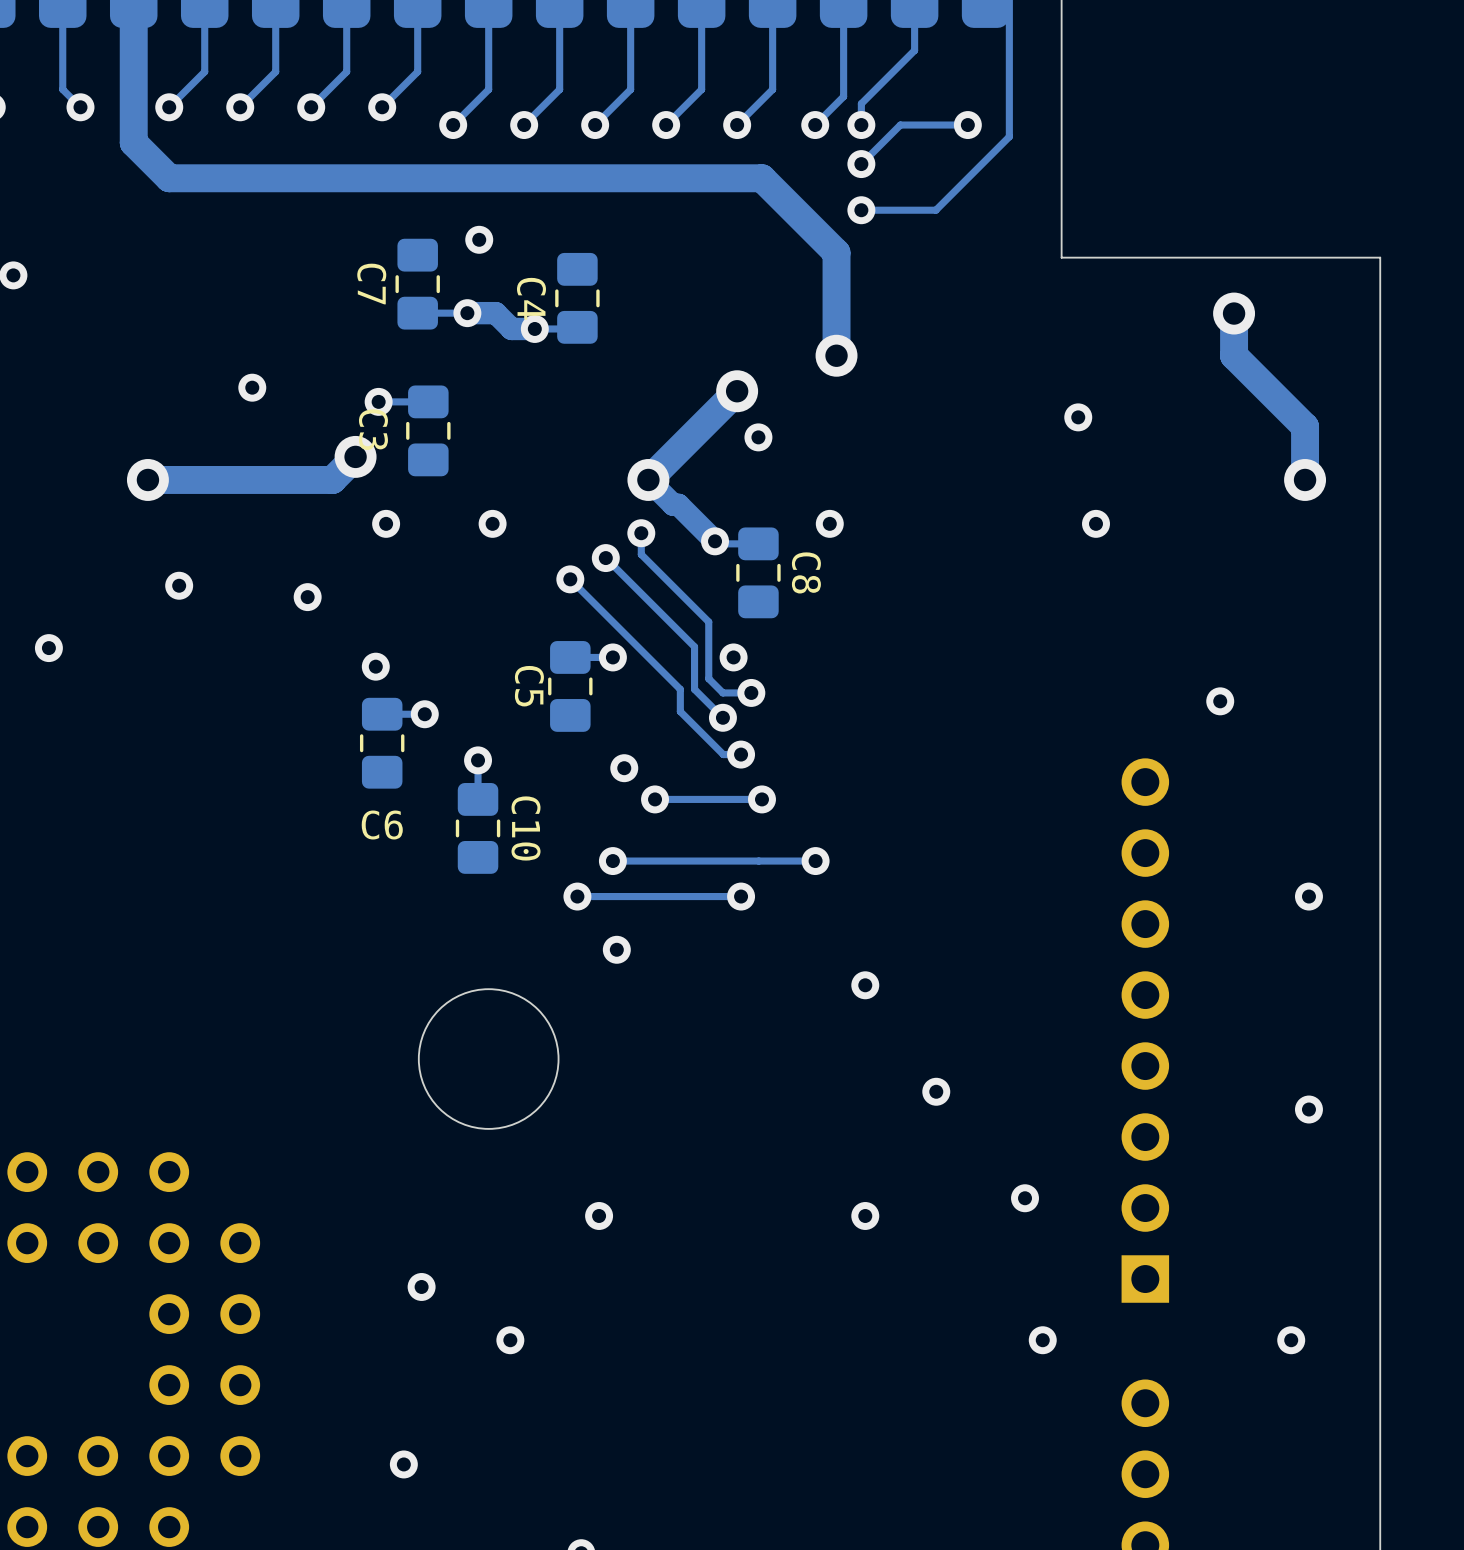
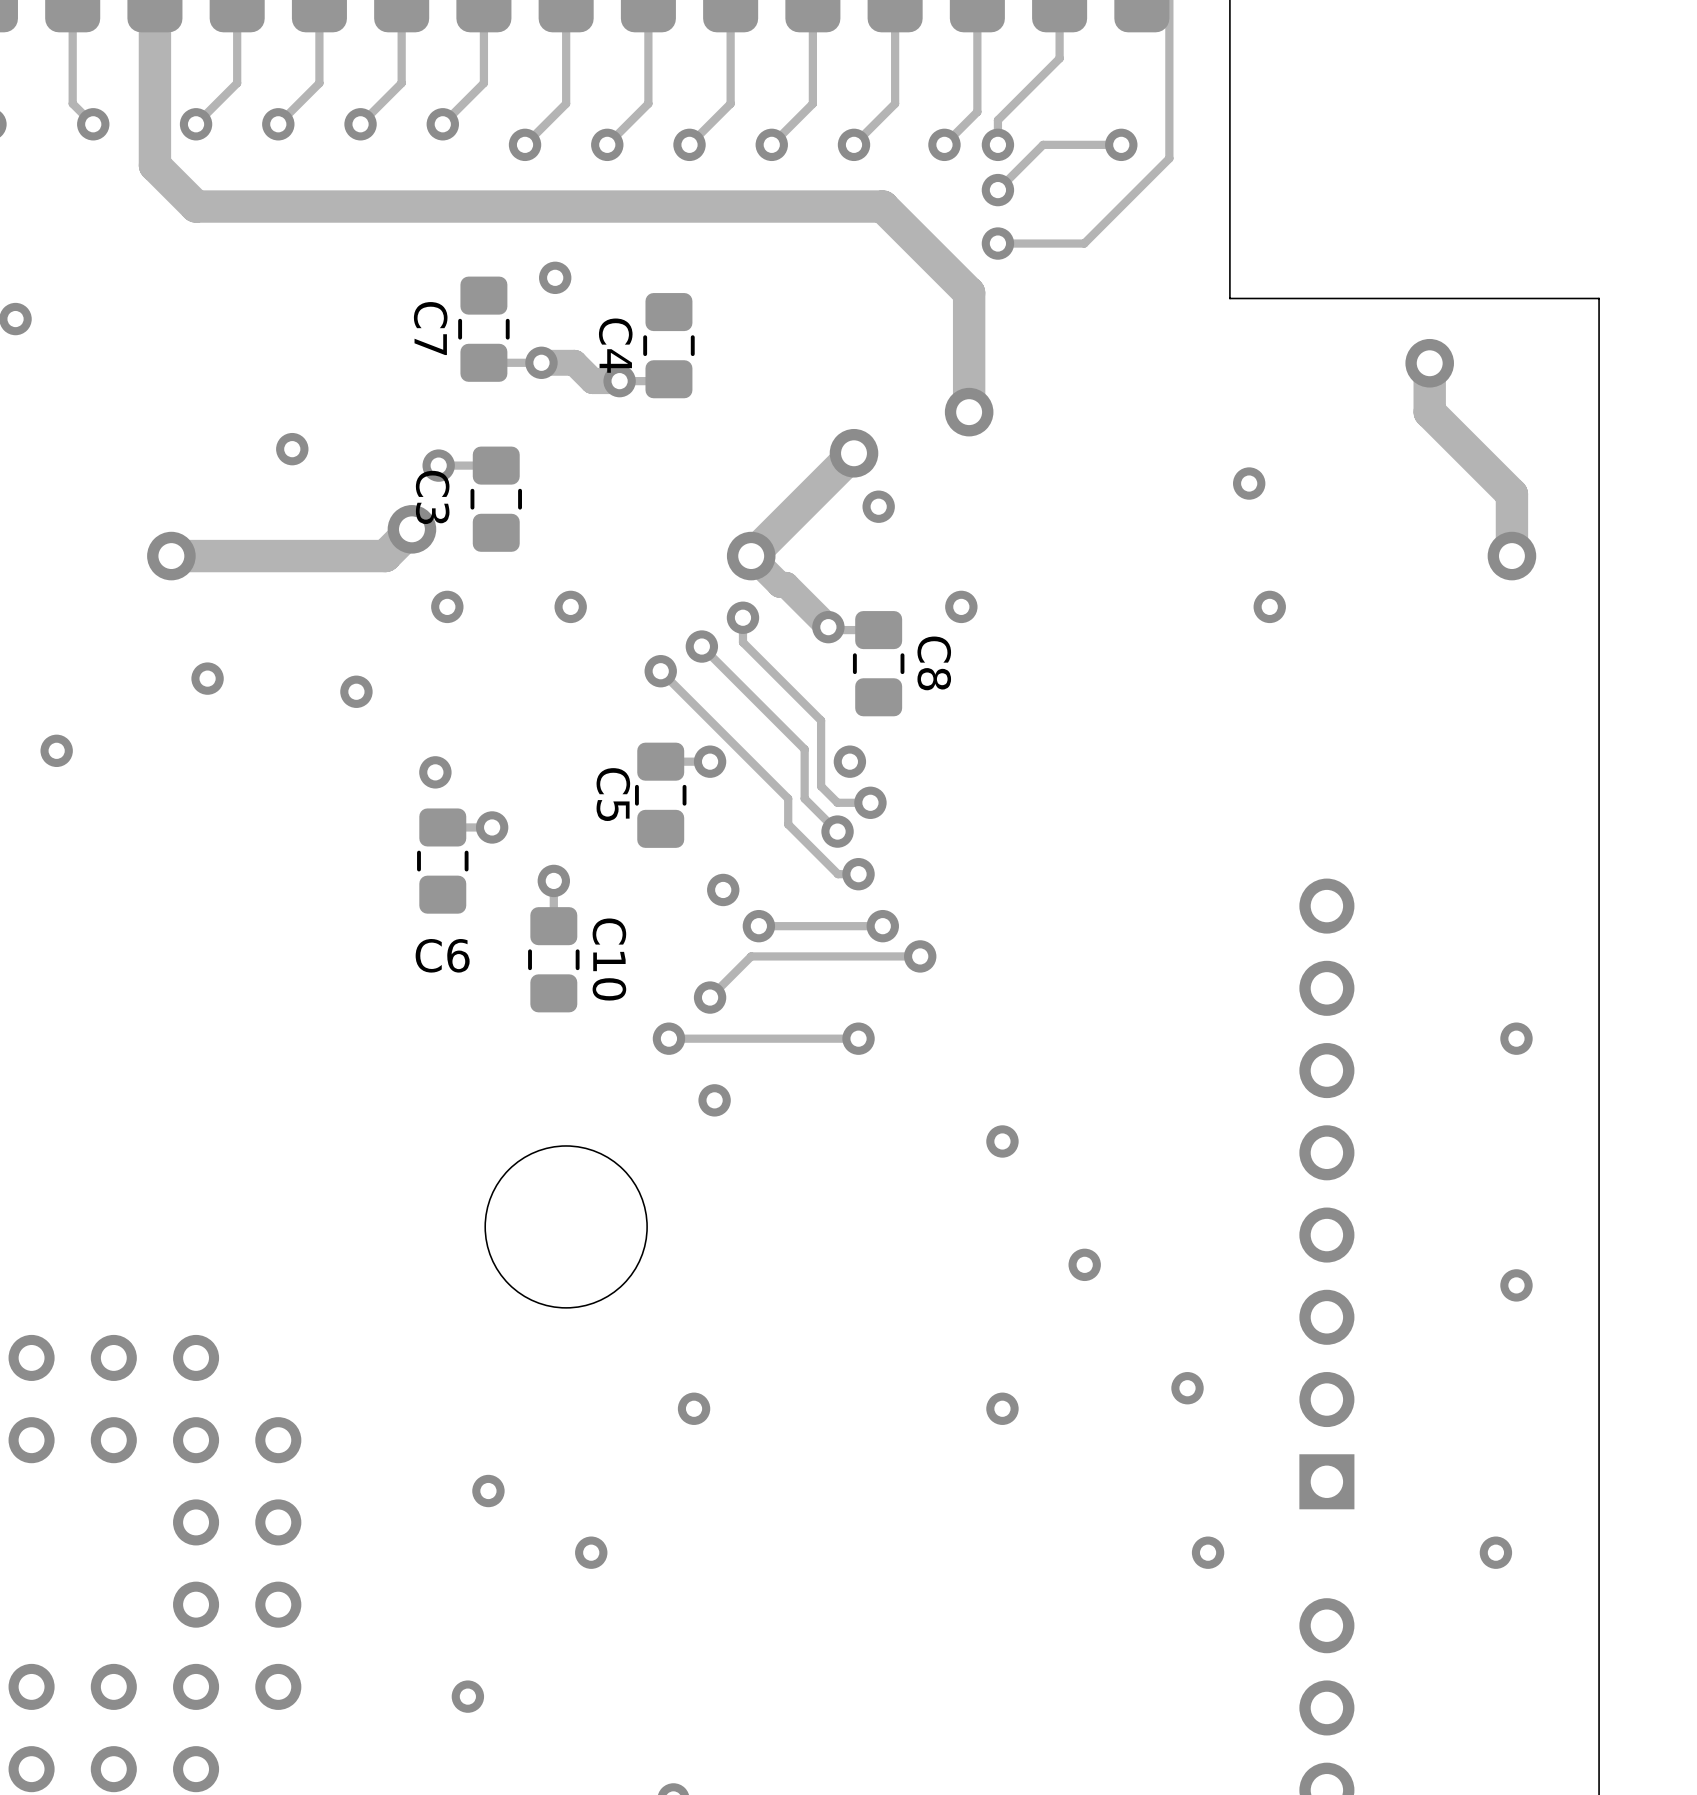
via: (1220, 701) -> none
track: (815, 861) (612, 861) -> (920, 956) (751, 956) (710, 997)
via position: (815, 861) -> (920, 956)

